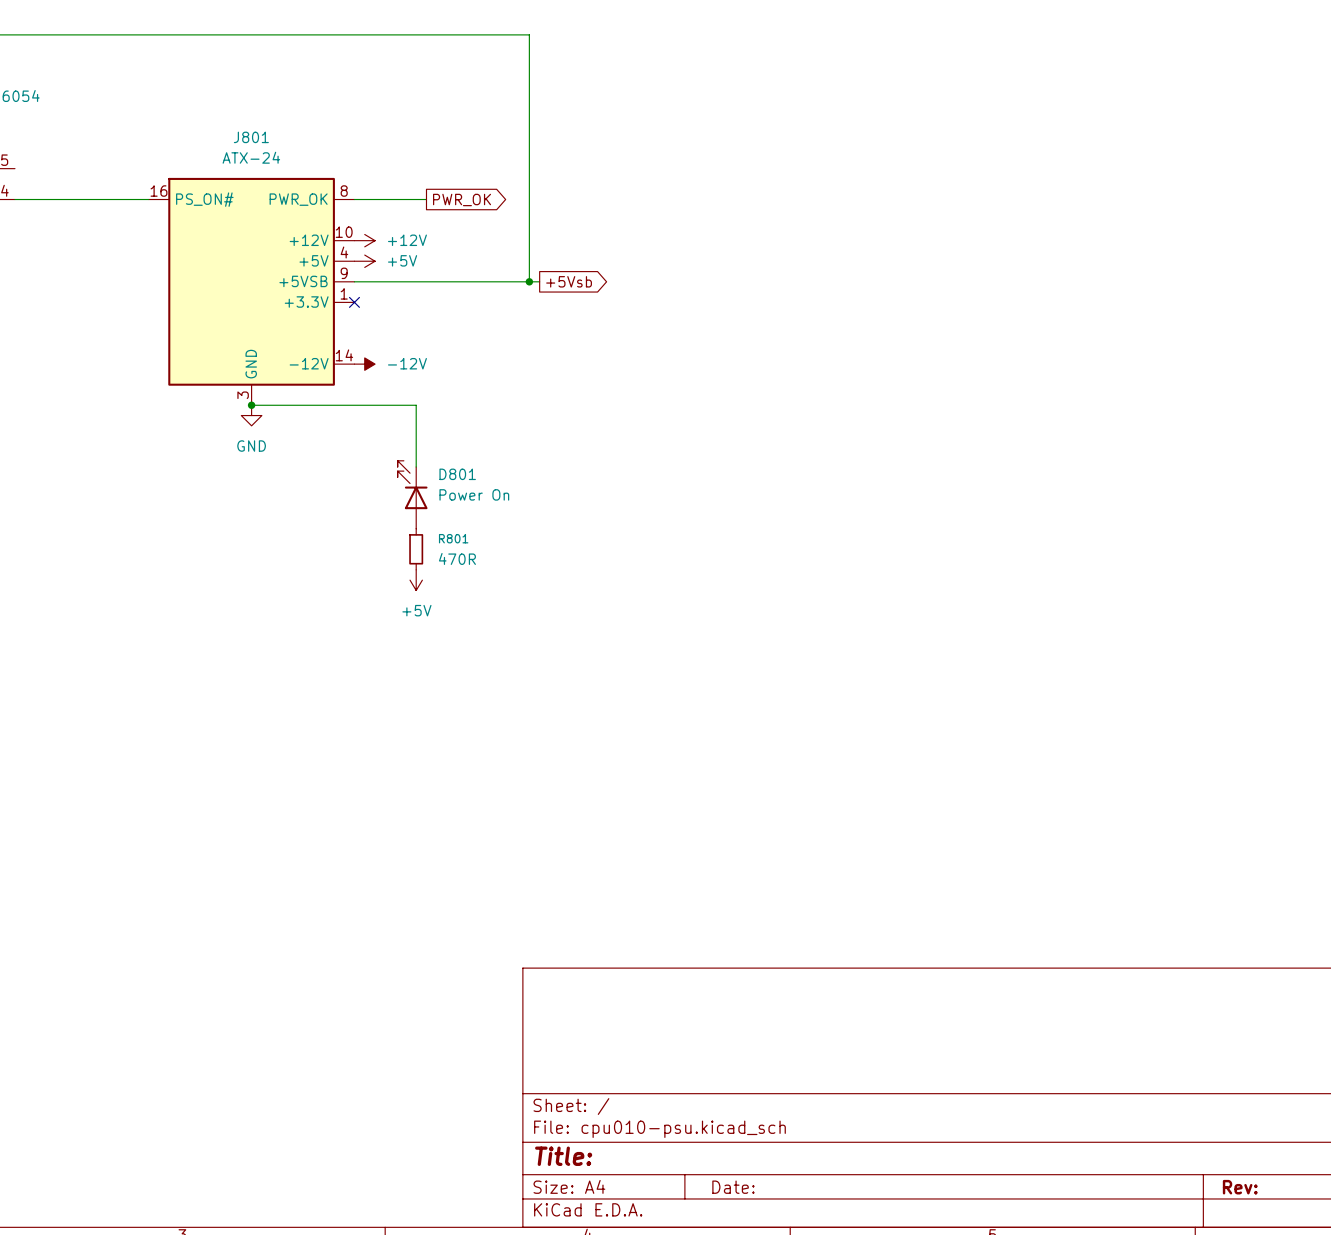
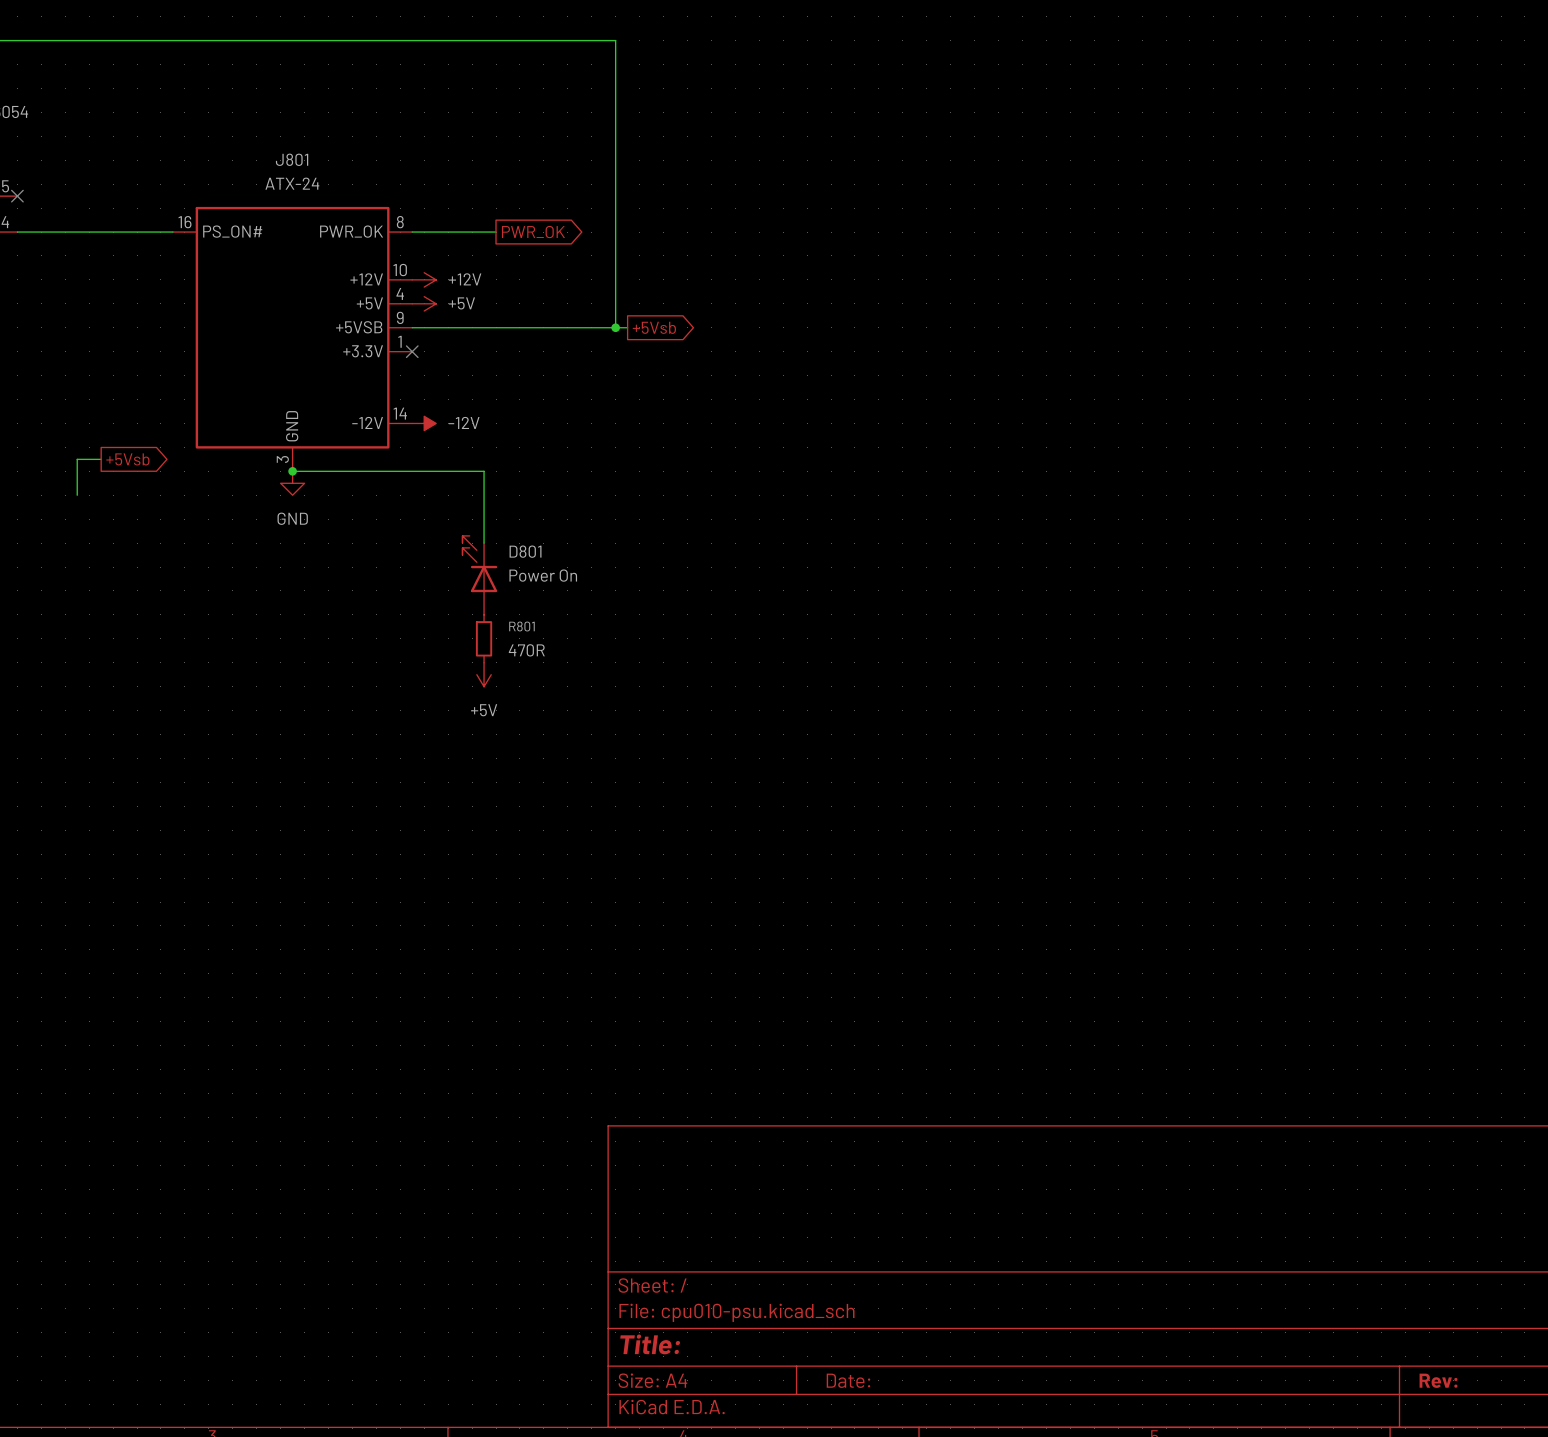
no-connect mark: none -> (17, 196)
wire: none -> (101, 459) (77, 459) (77, 495)
global label: none -> +5Vsb (127, 459)

